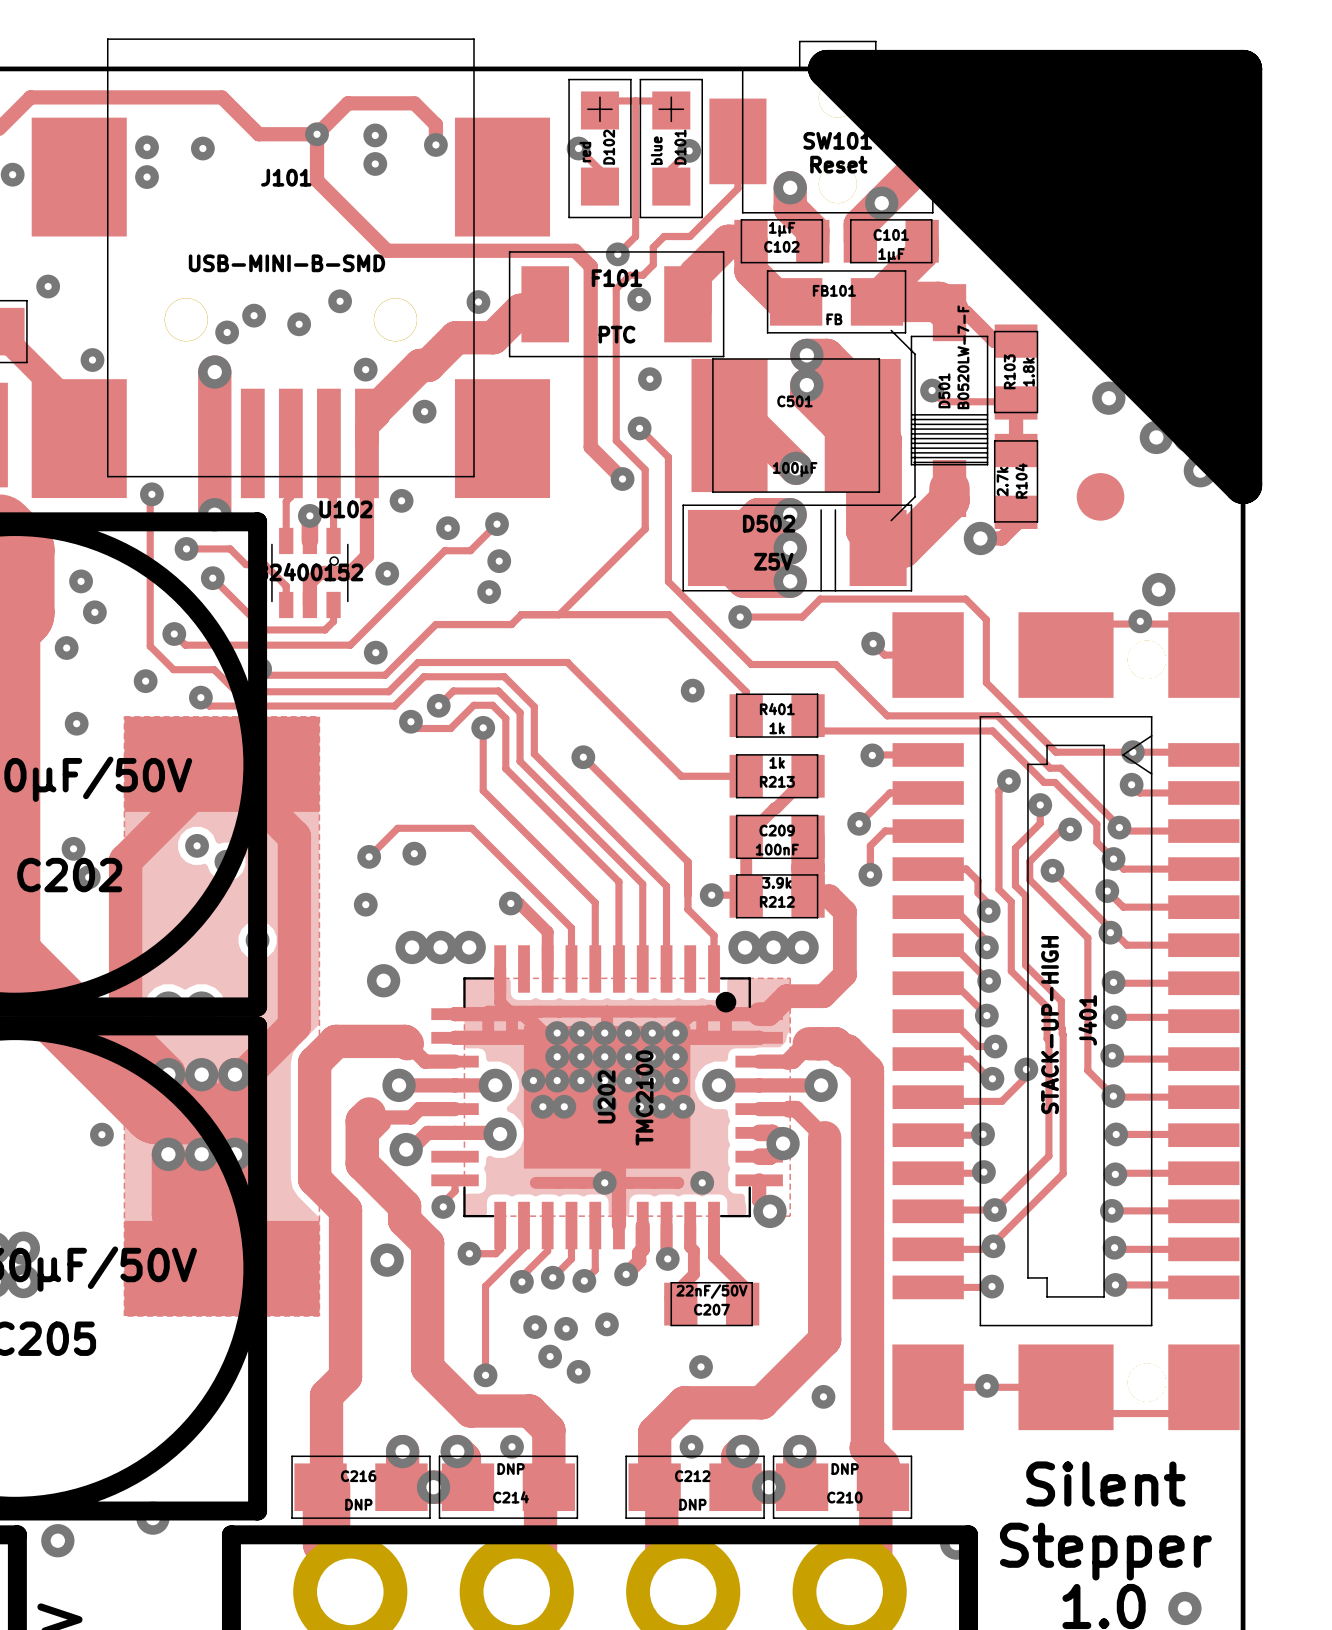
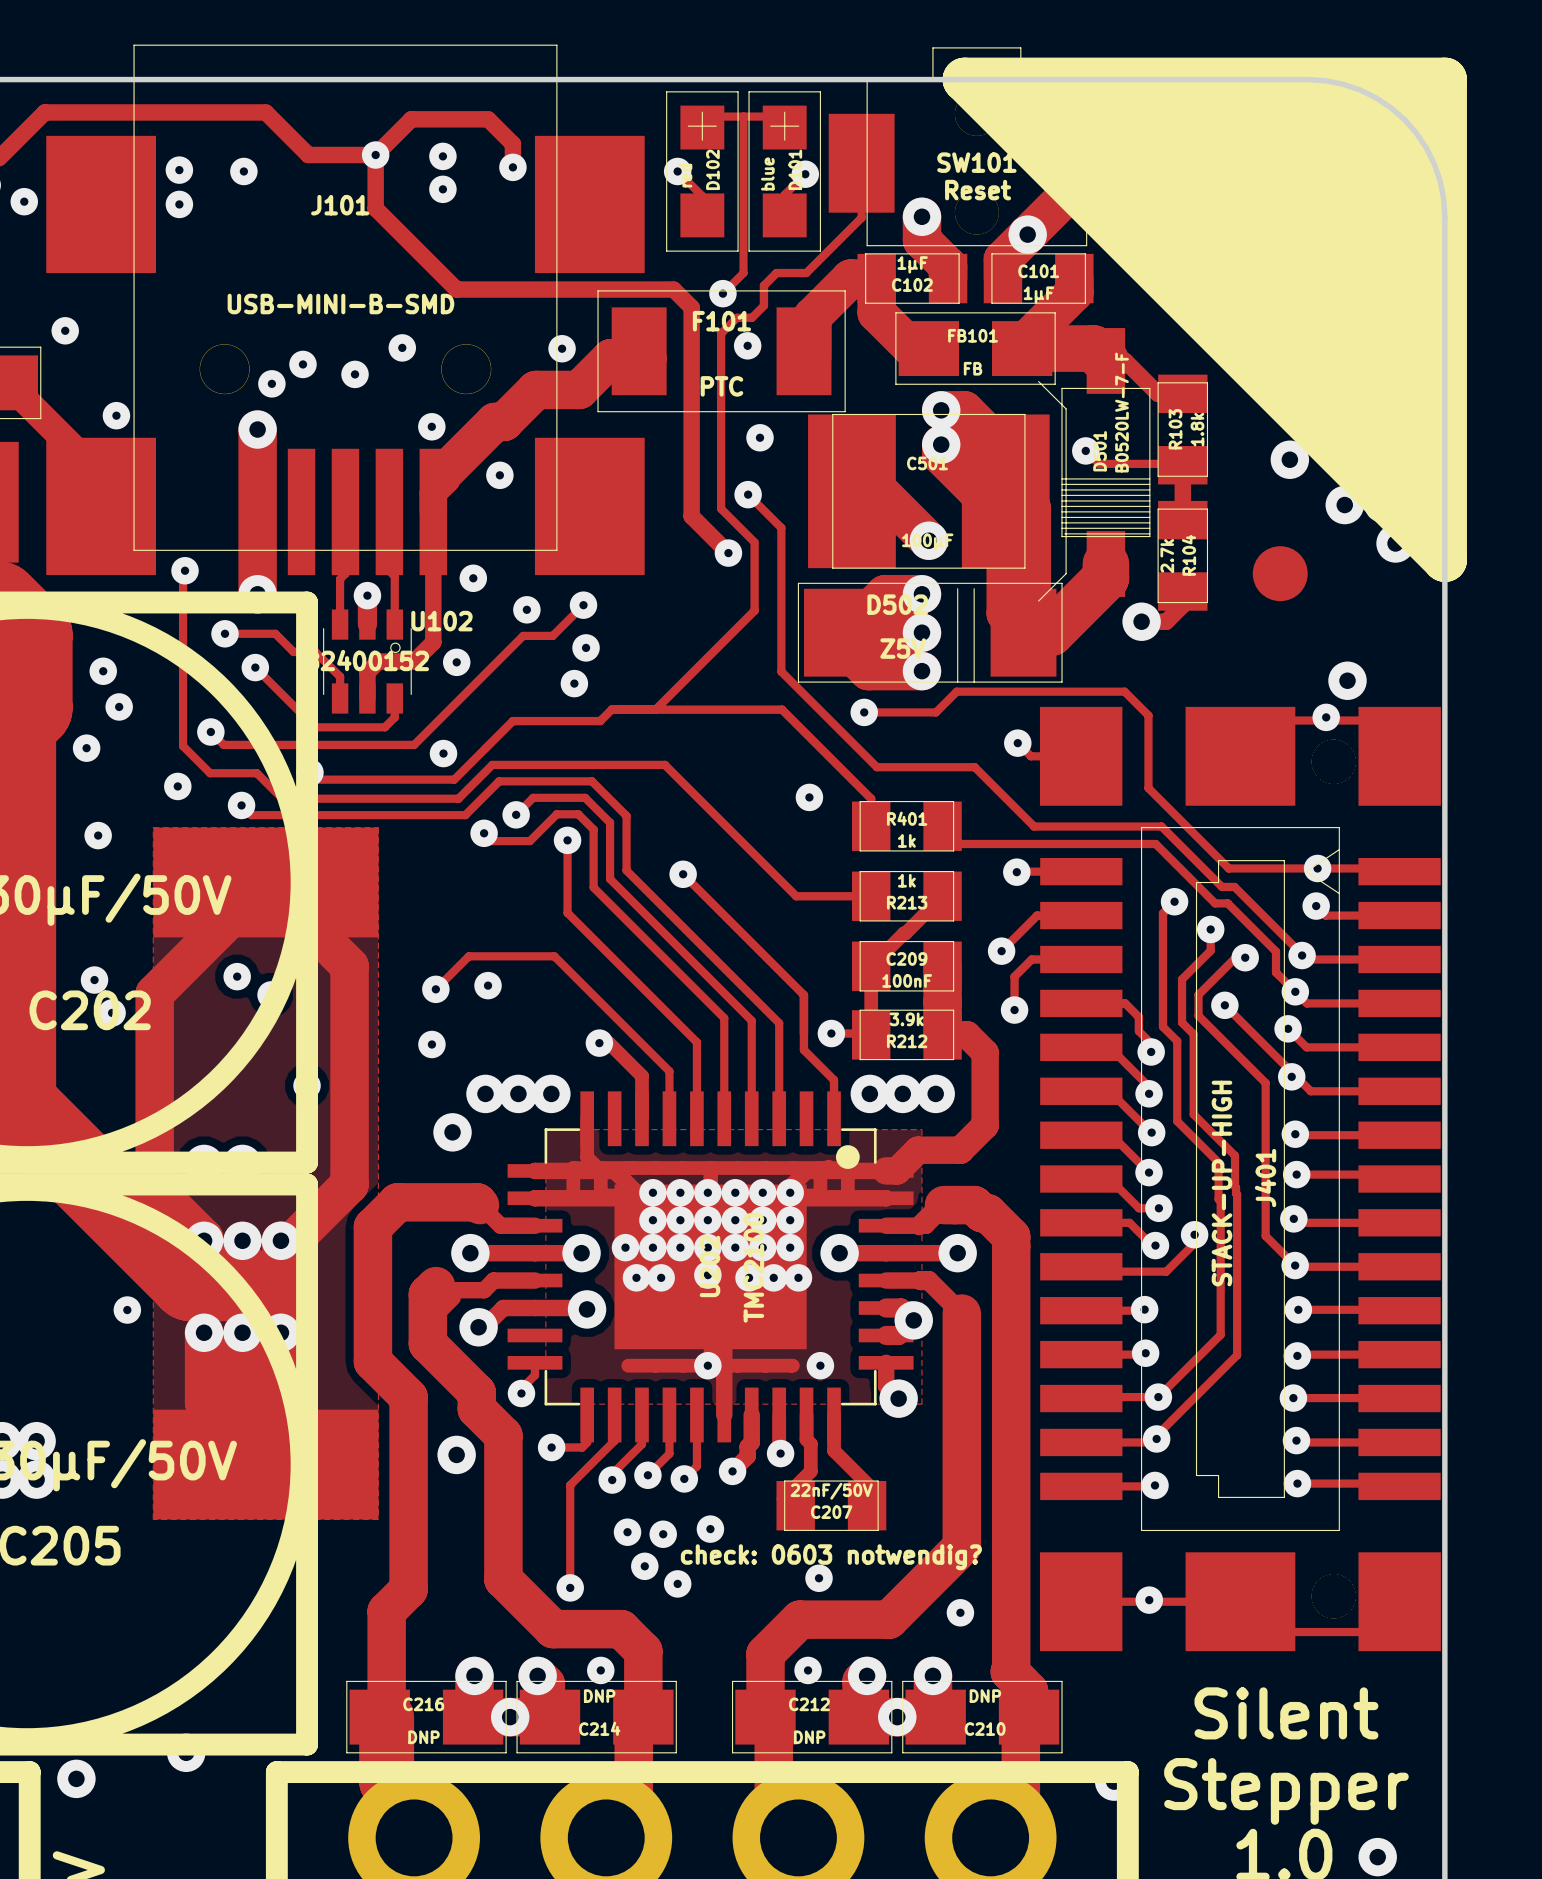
U102 name position: U102 (345, 509) -> U102 (441, 621)
text: none -> check: 0603 notwendig? (831, 1557)

